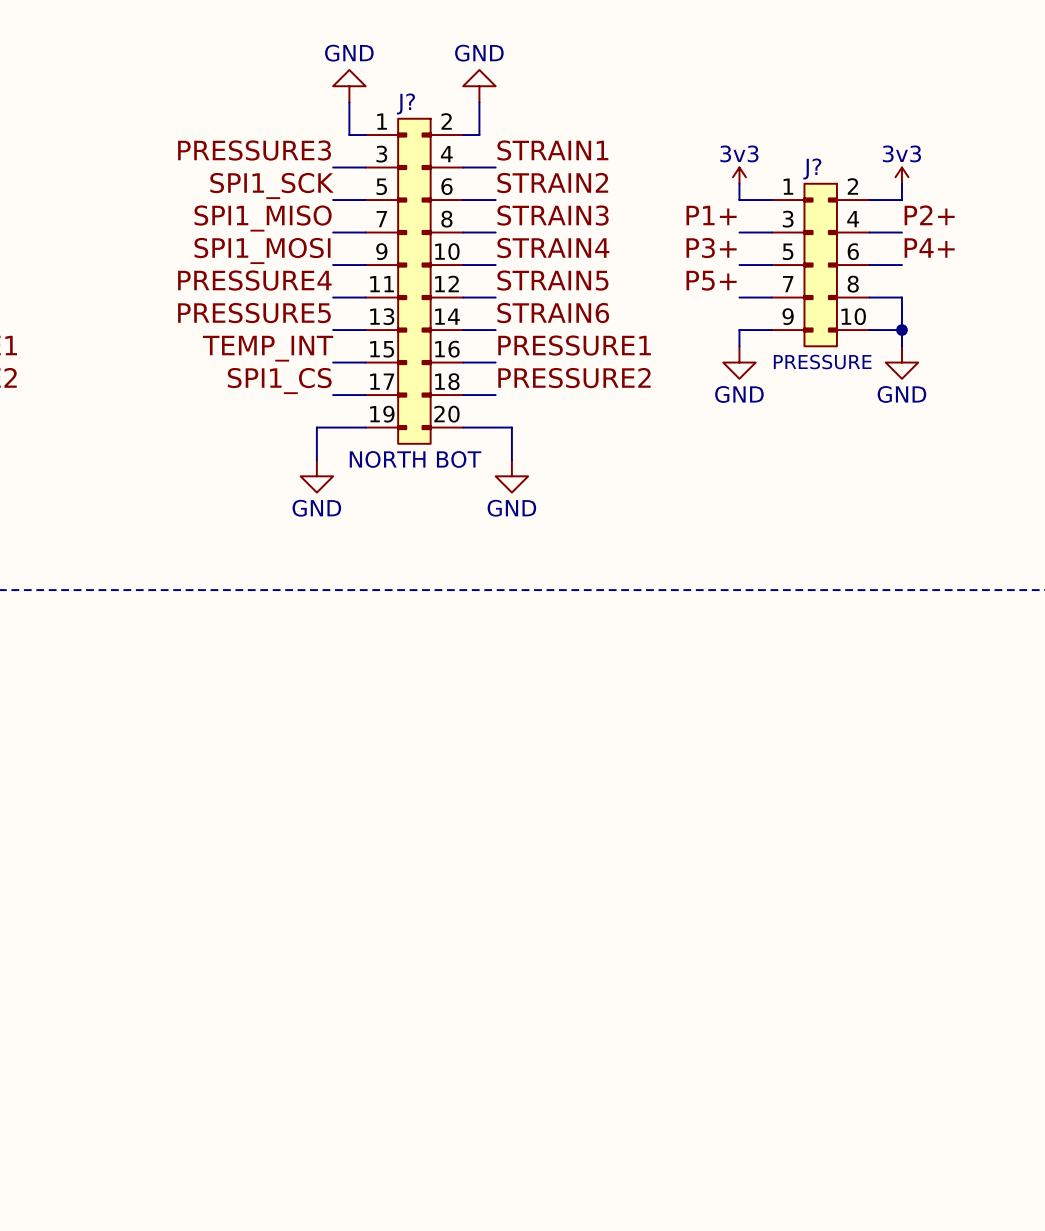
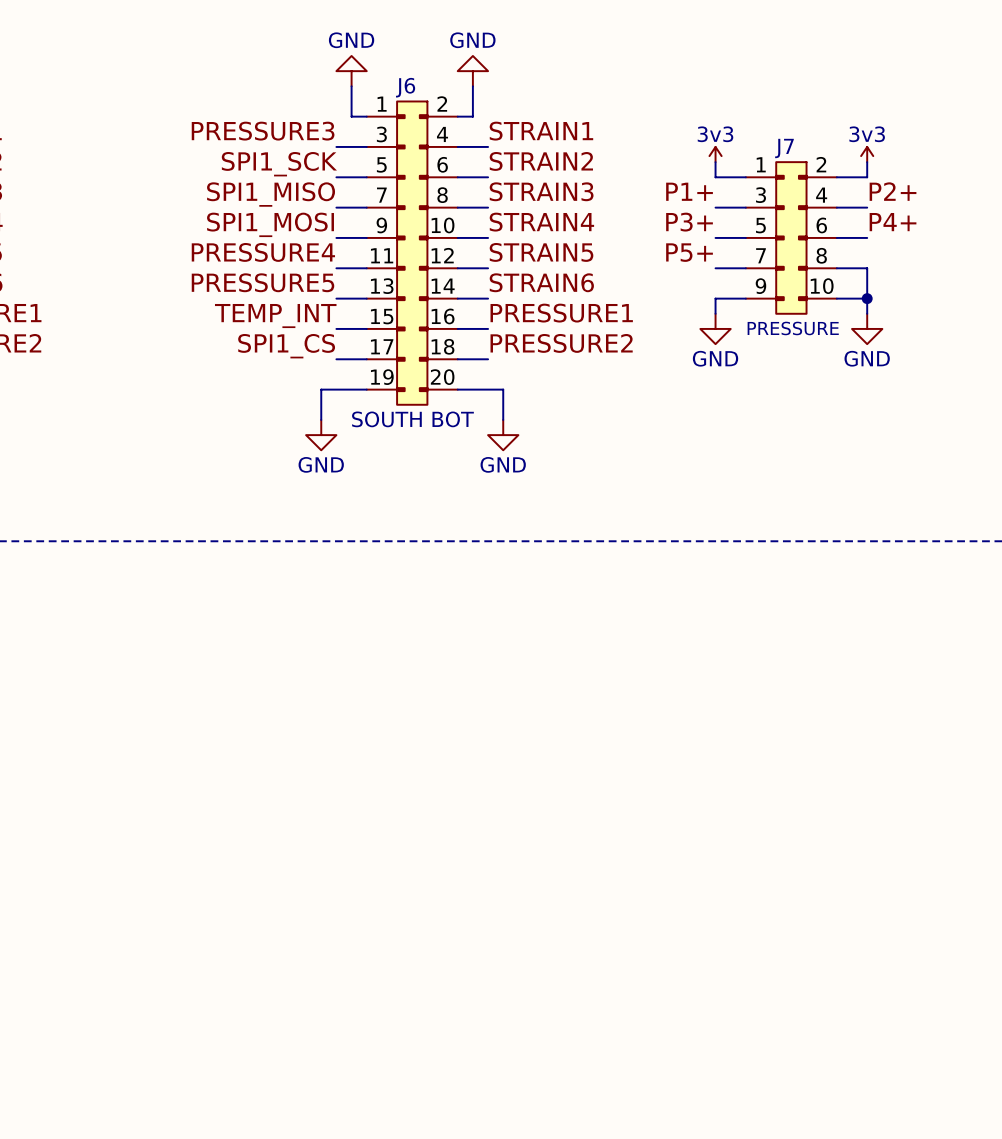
J? name: J? (405, 103) -> J6 (405, 87)
J? name: J? (812, 168) -> J7 (784, 148)
J? value: NORTH BOT (415, 459) -> SOUTH BOT (412, 419)

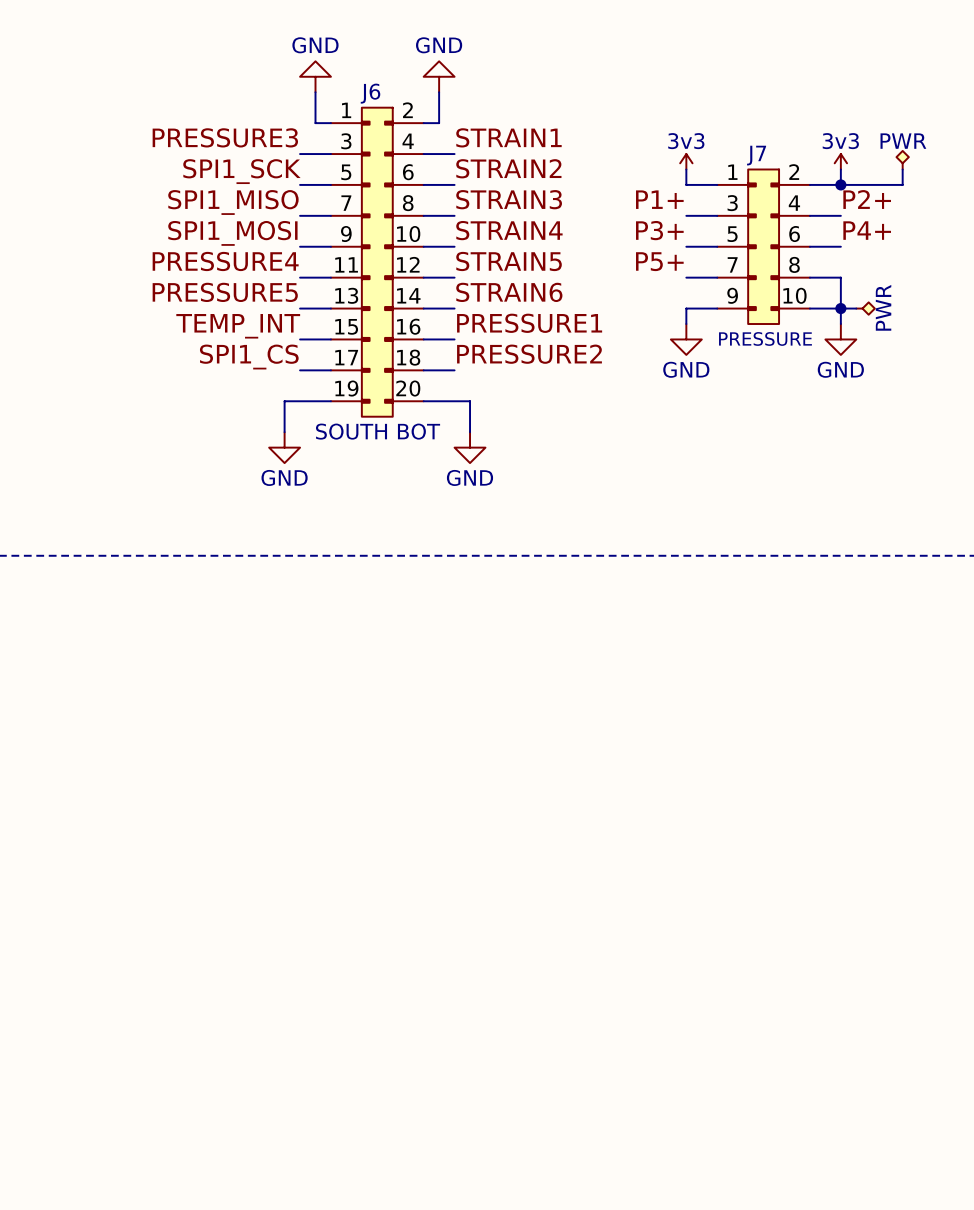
power symbol: none -> PWR (902, 160)
wire: none -> (902, 169) (902, 184) (840, 184)
junction: none -> (840, 184)
wire: none -> (840, 308) (856, 308)
power symbol: none -> PWR (865, 308)

